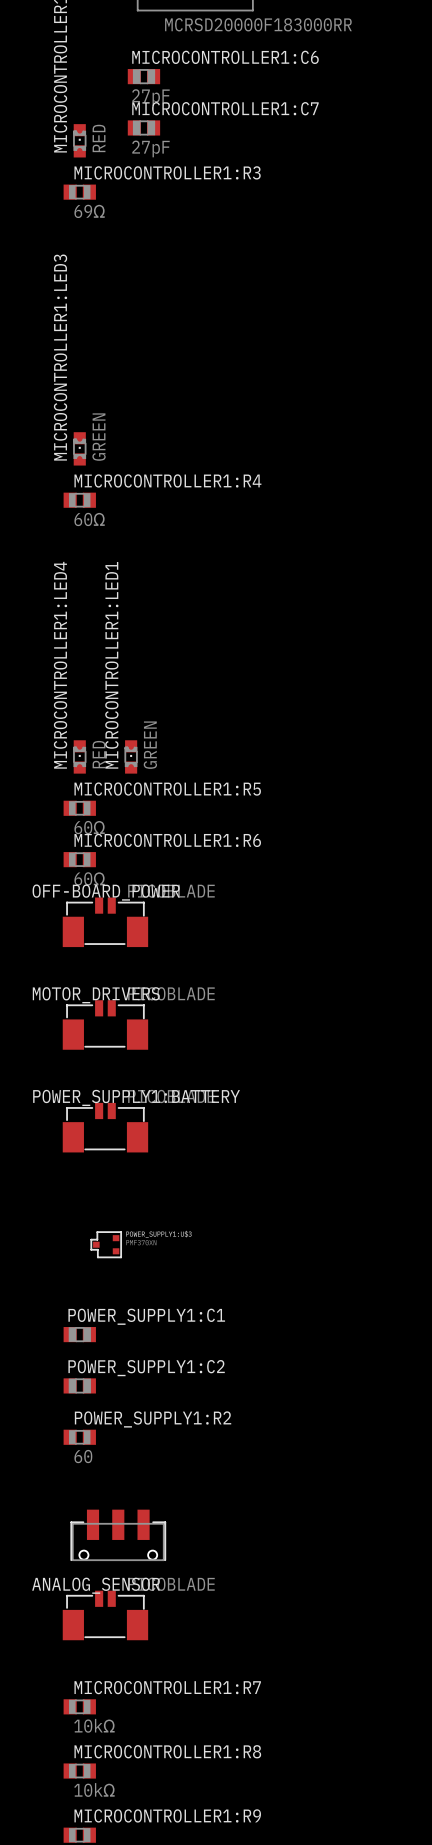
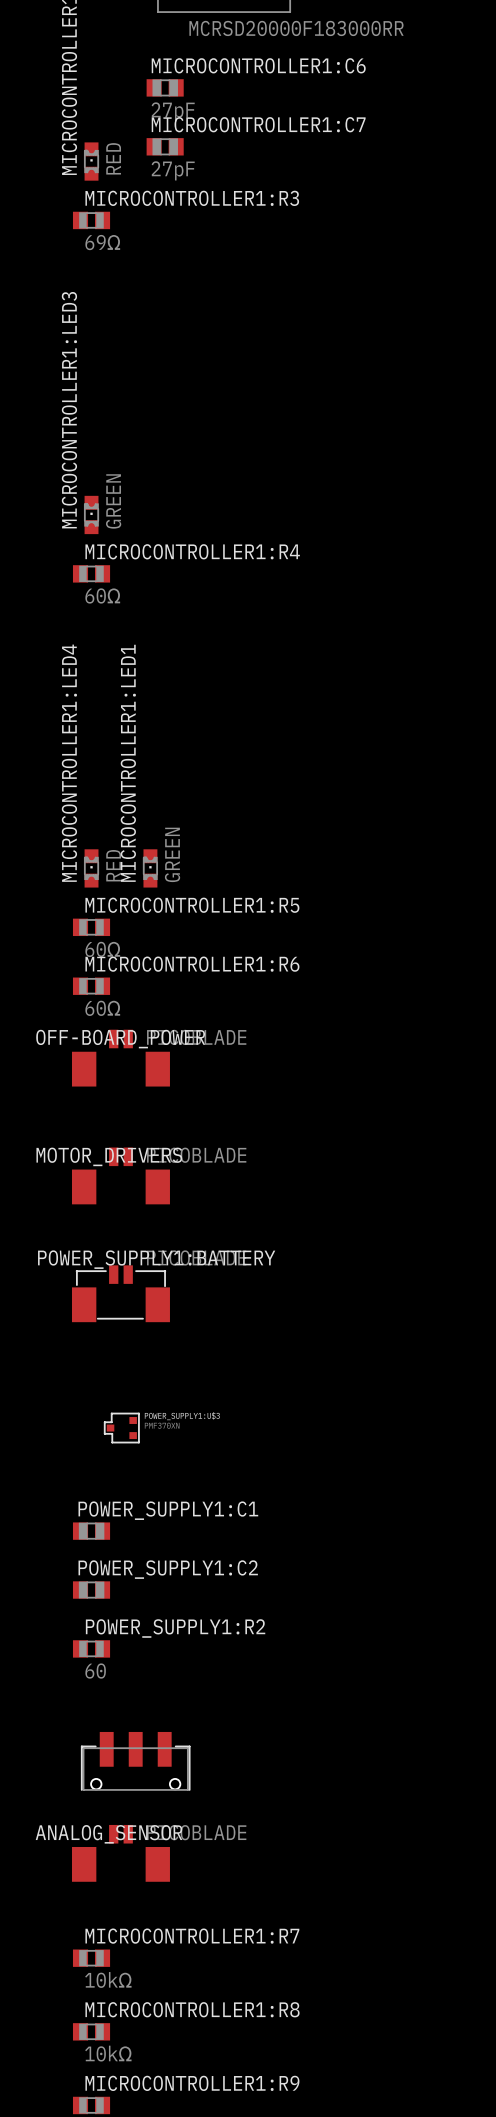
OFF-BOARD_POWER footprint: [62, 897, 149, 948] -> [71, 1029, 170, 1087]
MOTOR_DRIVERS footprint: [62, 1000, 149, 1050] -> [71, 1147, 170, 1205]
ANALOG_SENSOR footprint: [62, 1590, 149, 1641] -> [71, 1824, 170, 1882]

